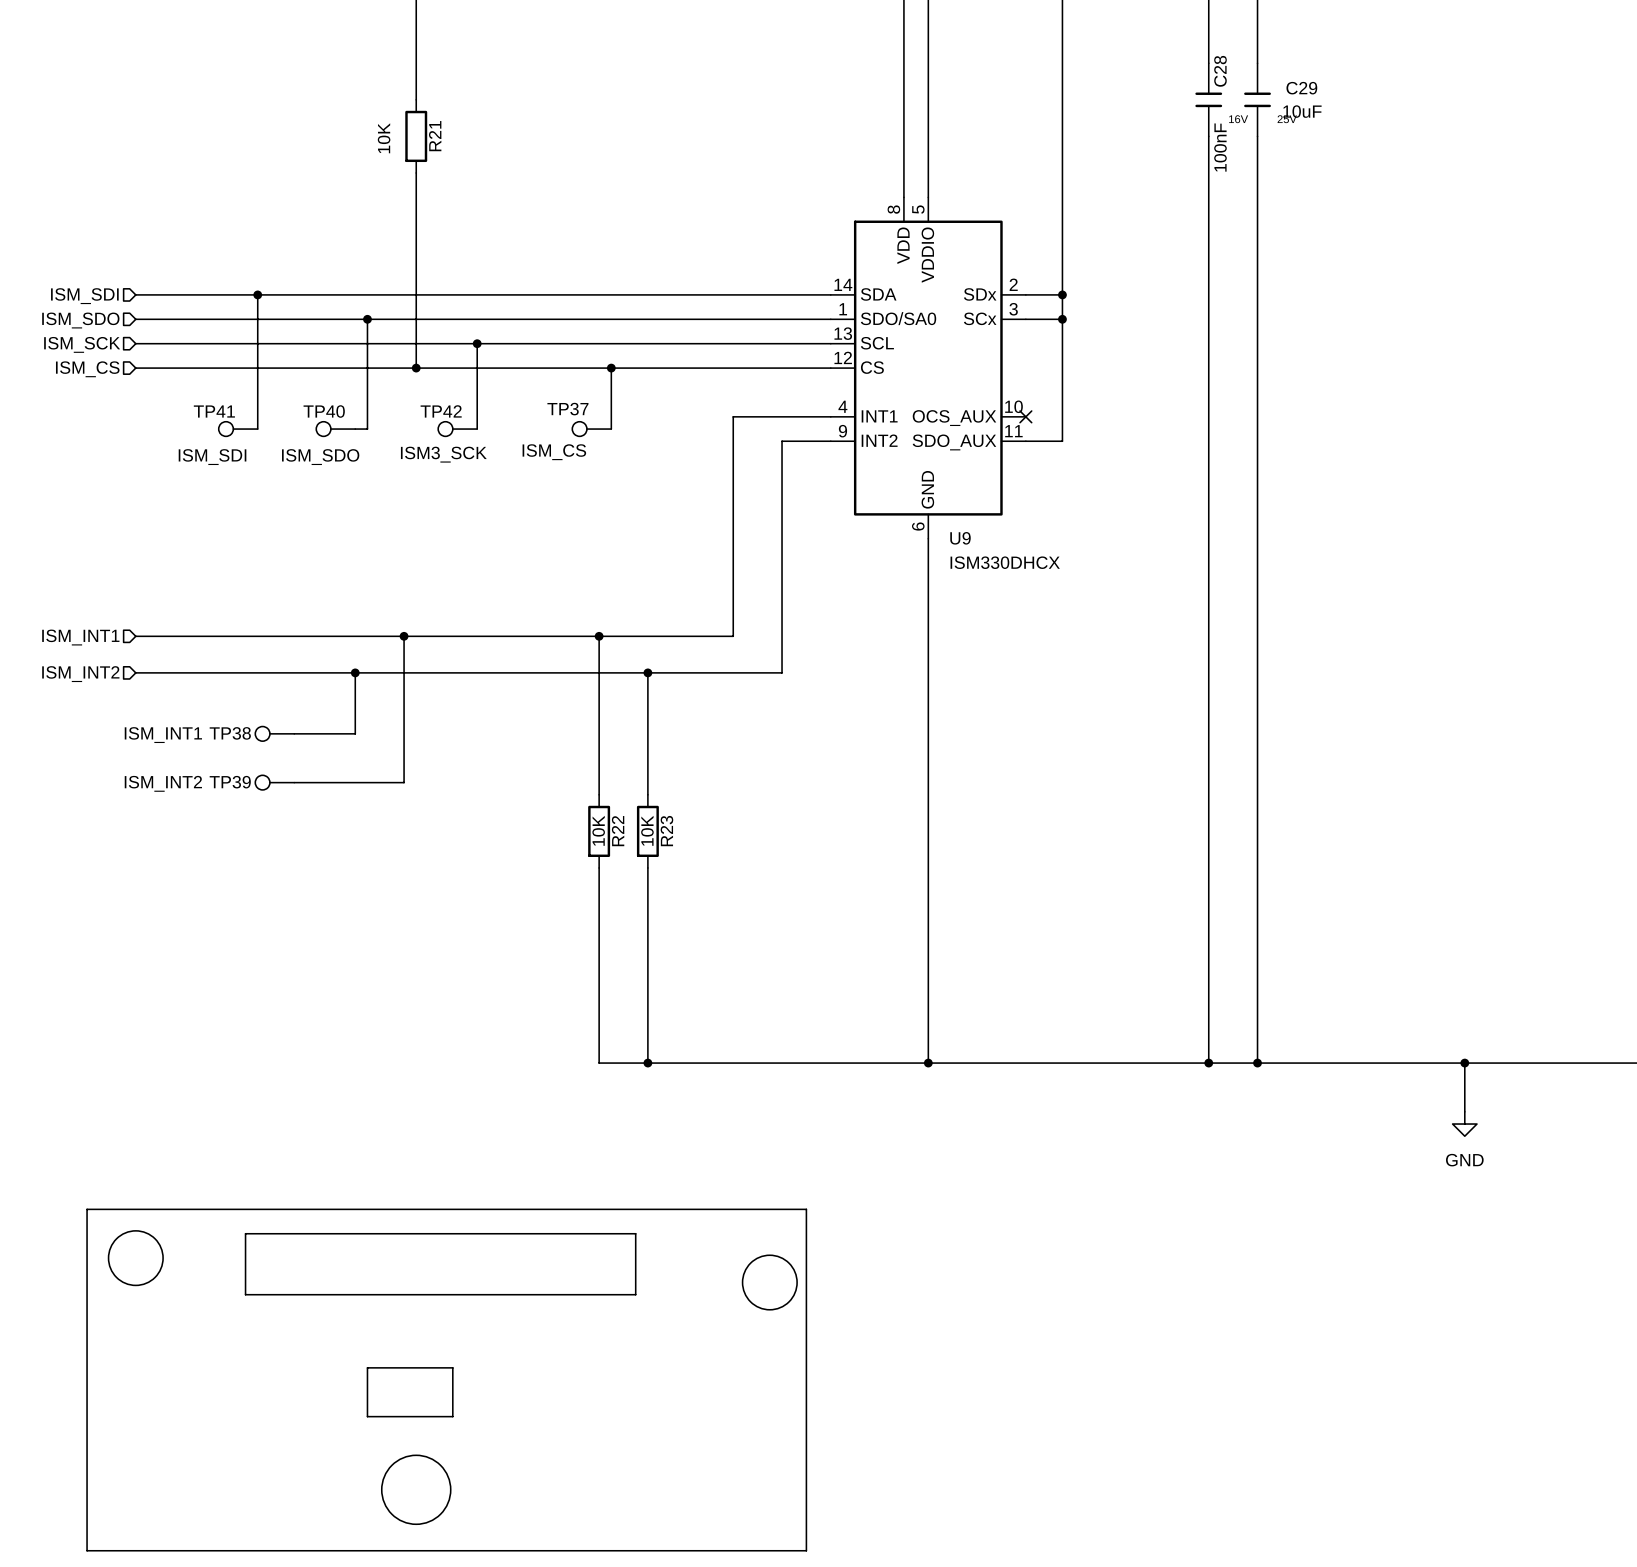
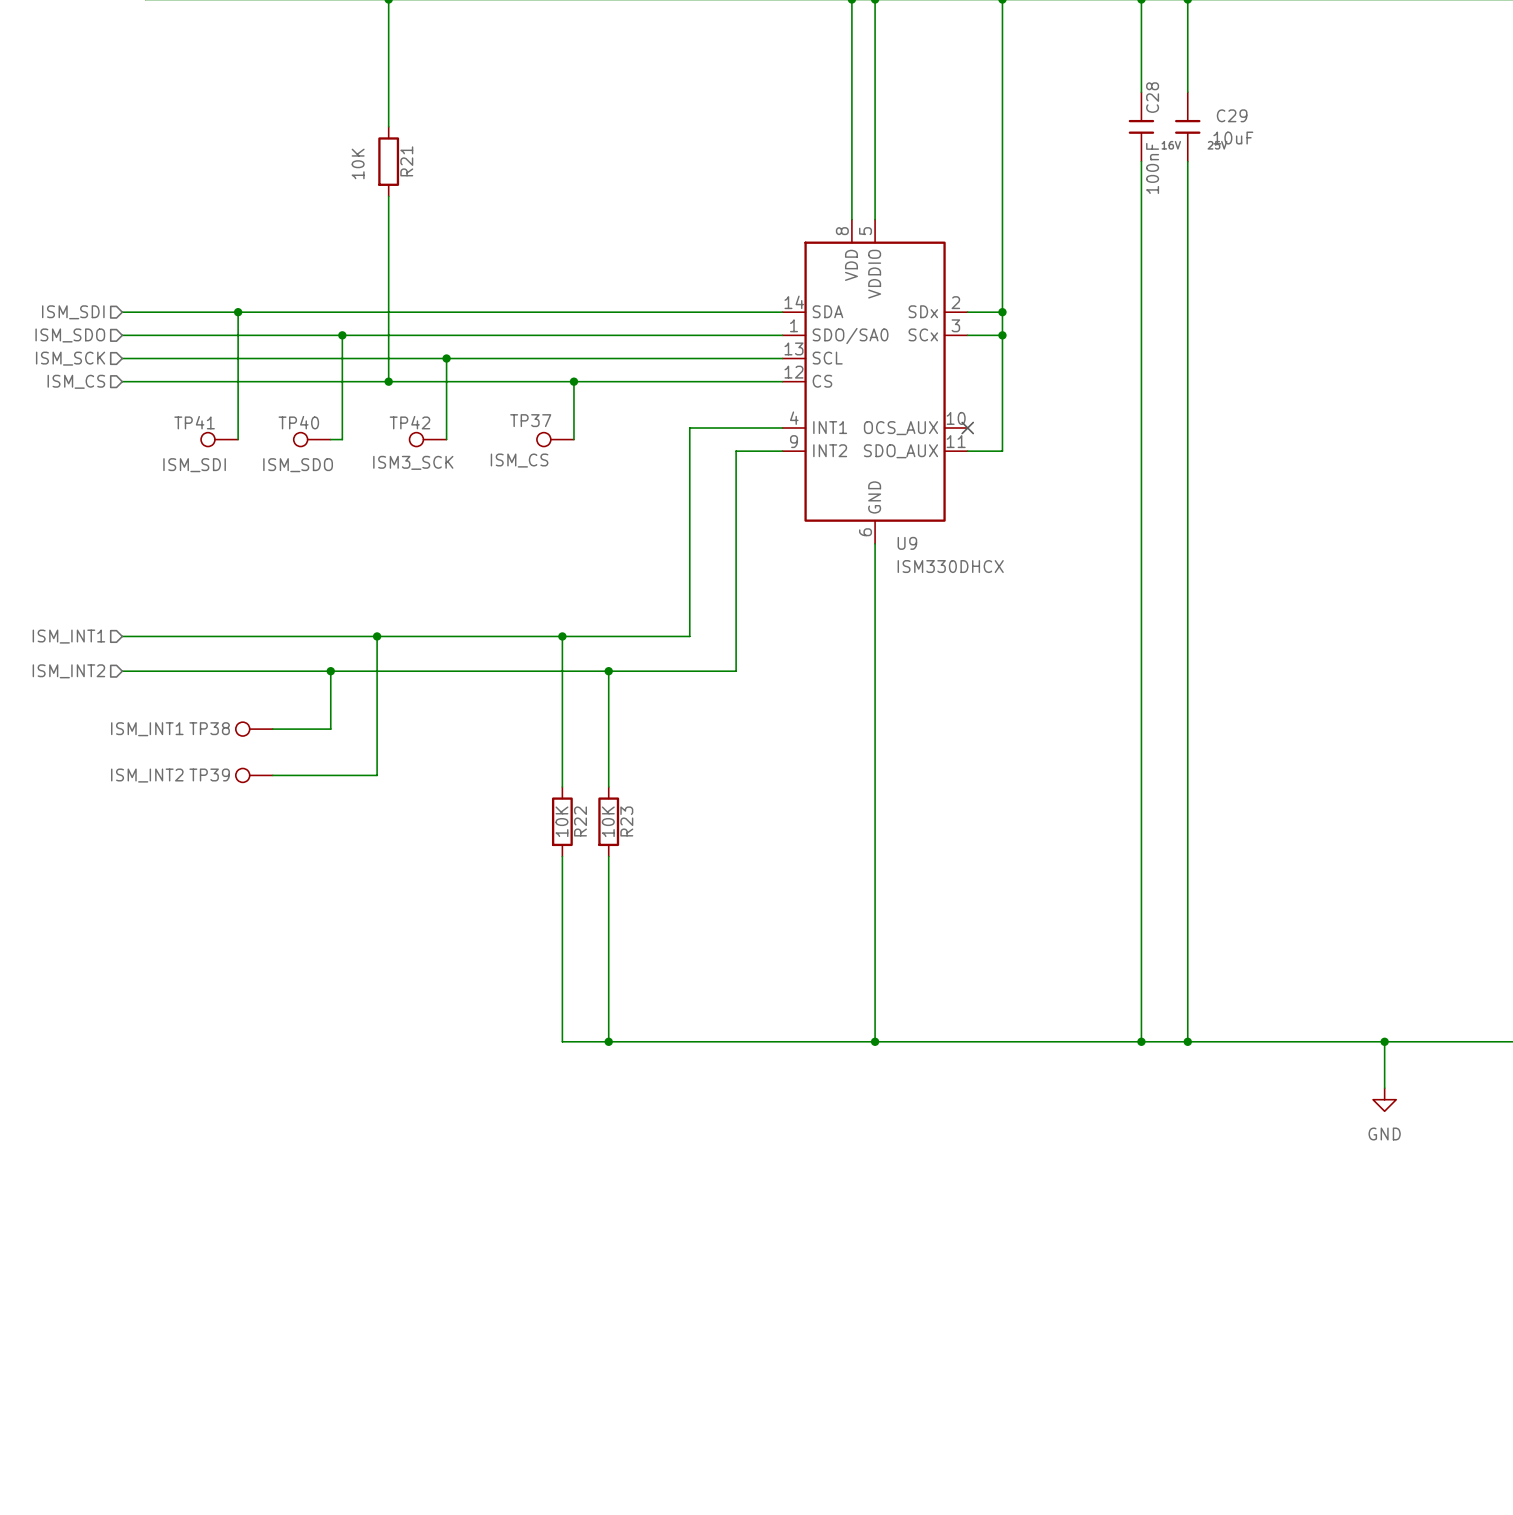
line: (87, 1209) (806, 1209) (806, 1550) (87, 1550) (87, 1209) -> none
drawing: [108, 1230, 164, 1286] -> none
line: (245, 1233) (635, 1233) (635, 1294) (245, 1294) (245, 1233) -> none
drawing: [742, 1255, 798, 1310] -> none
line: (367, 1367) (452, 1367) (452, 1416) (367, 1416) (367, 1367) -> none
drawing: [381, 1455, 451, 1525] -> none

